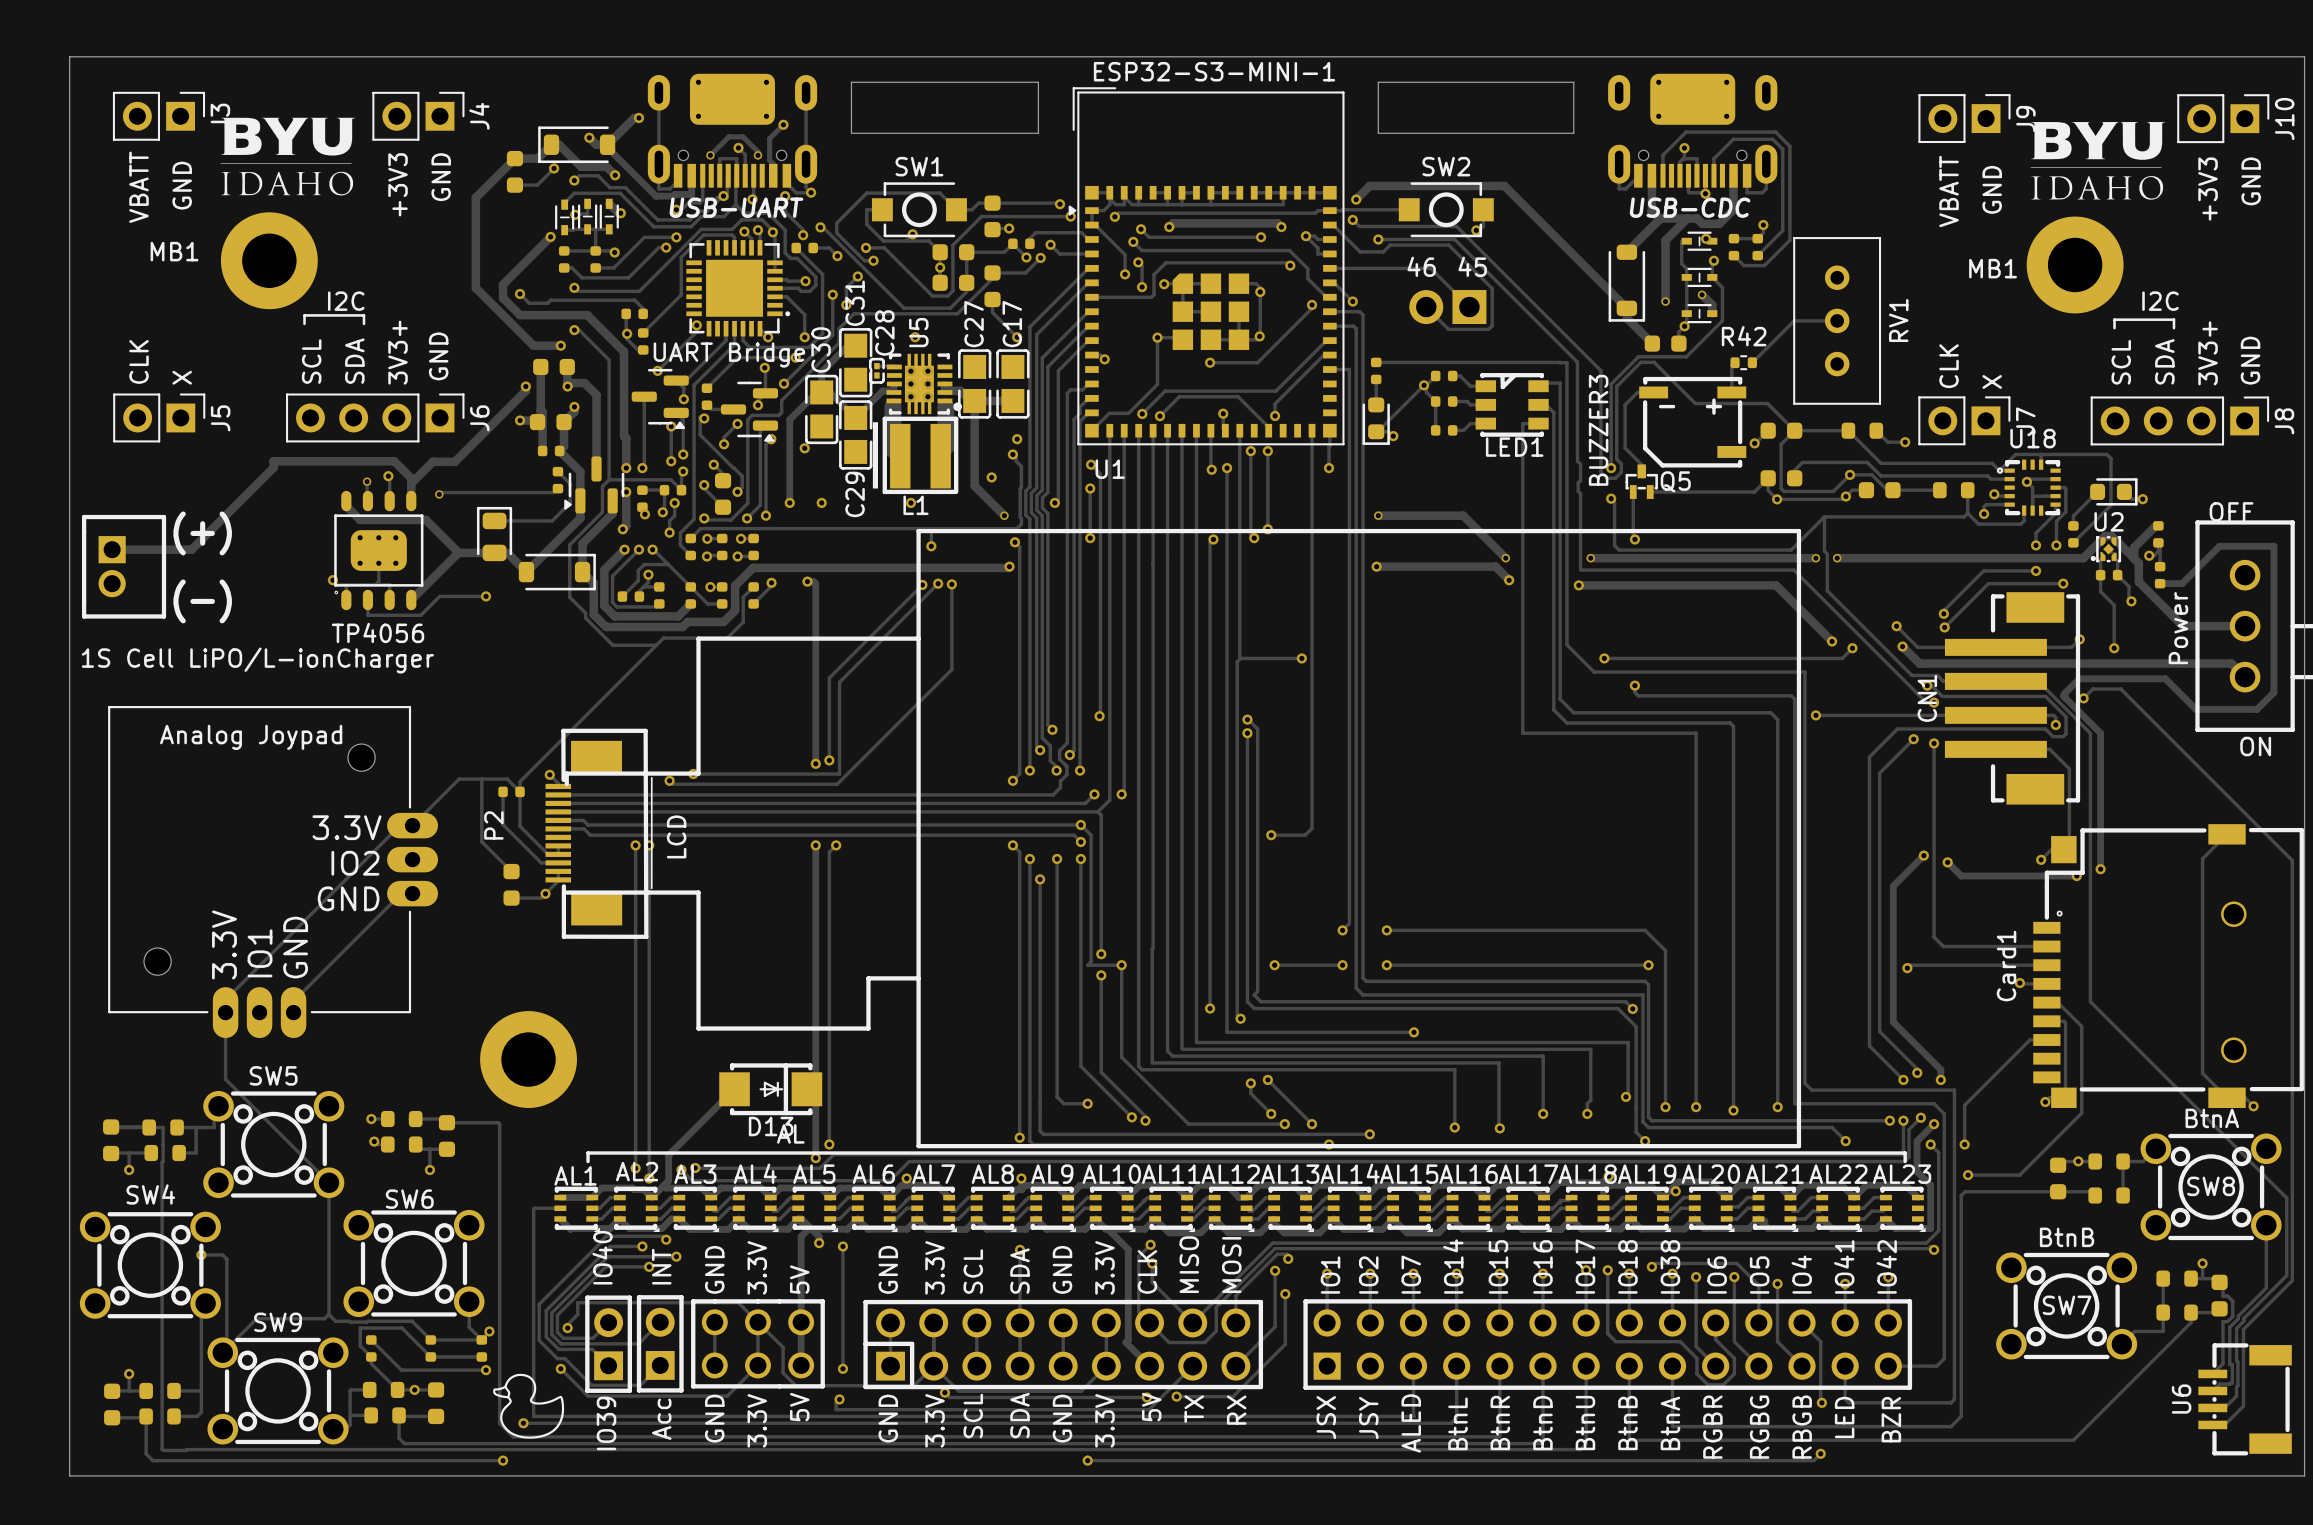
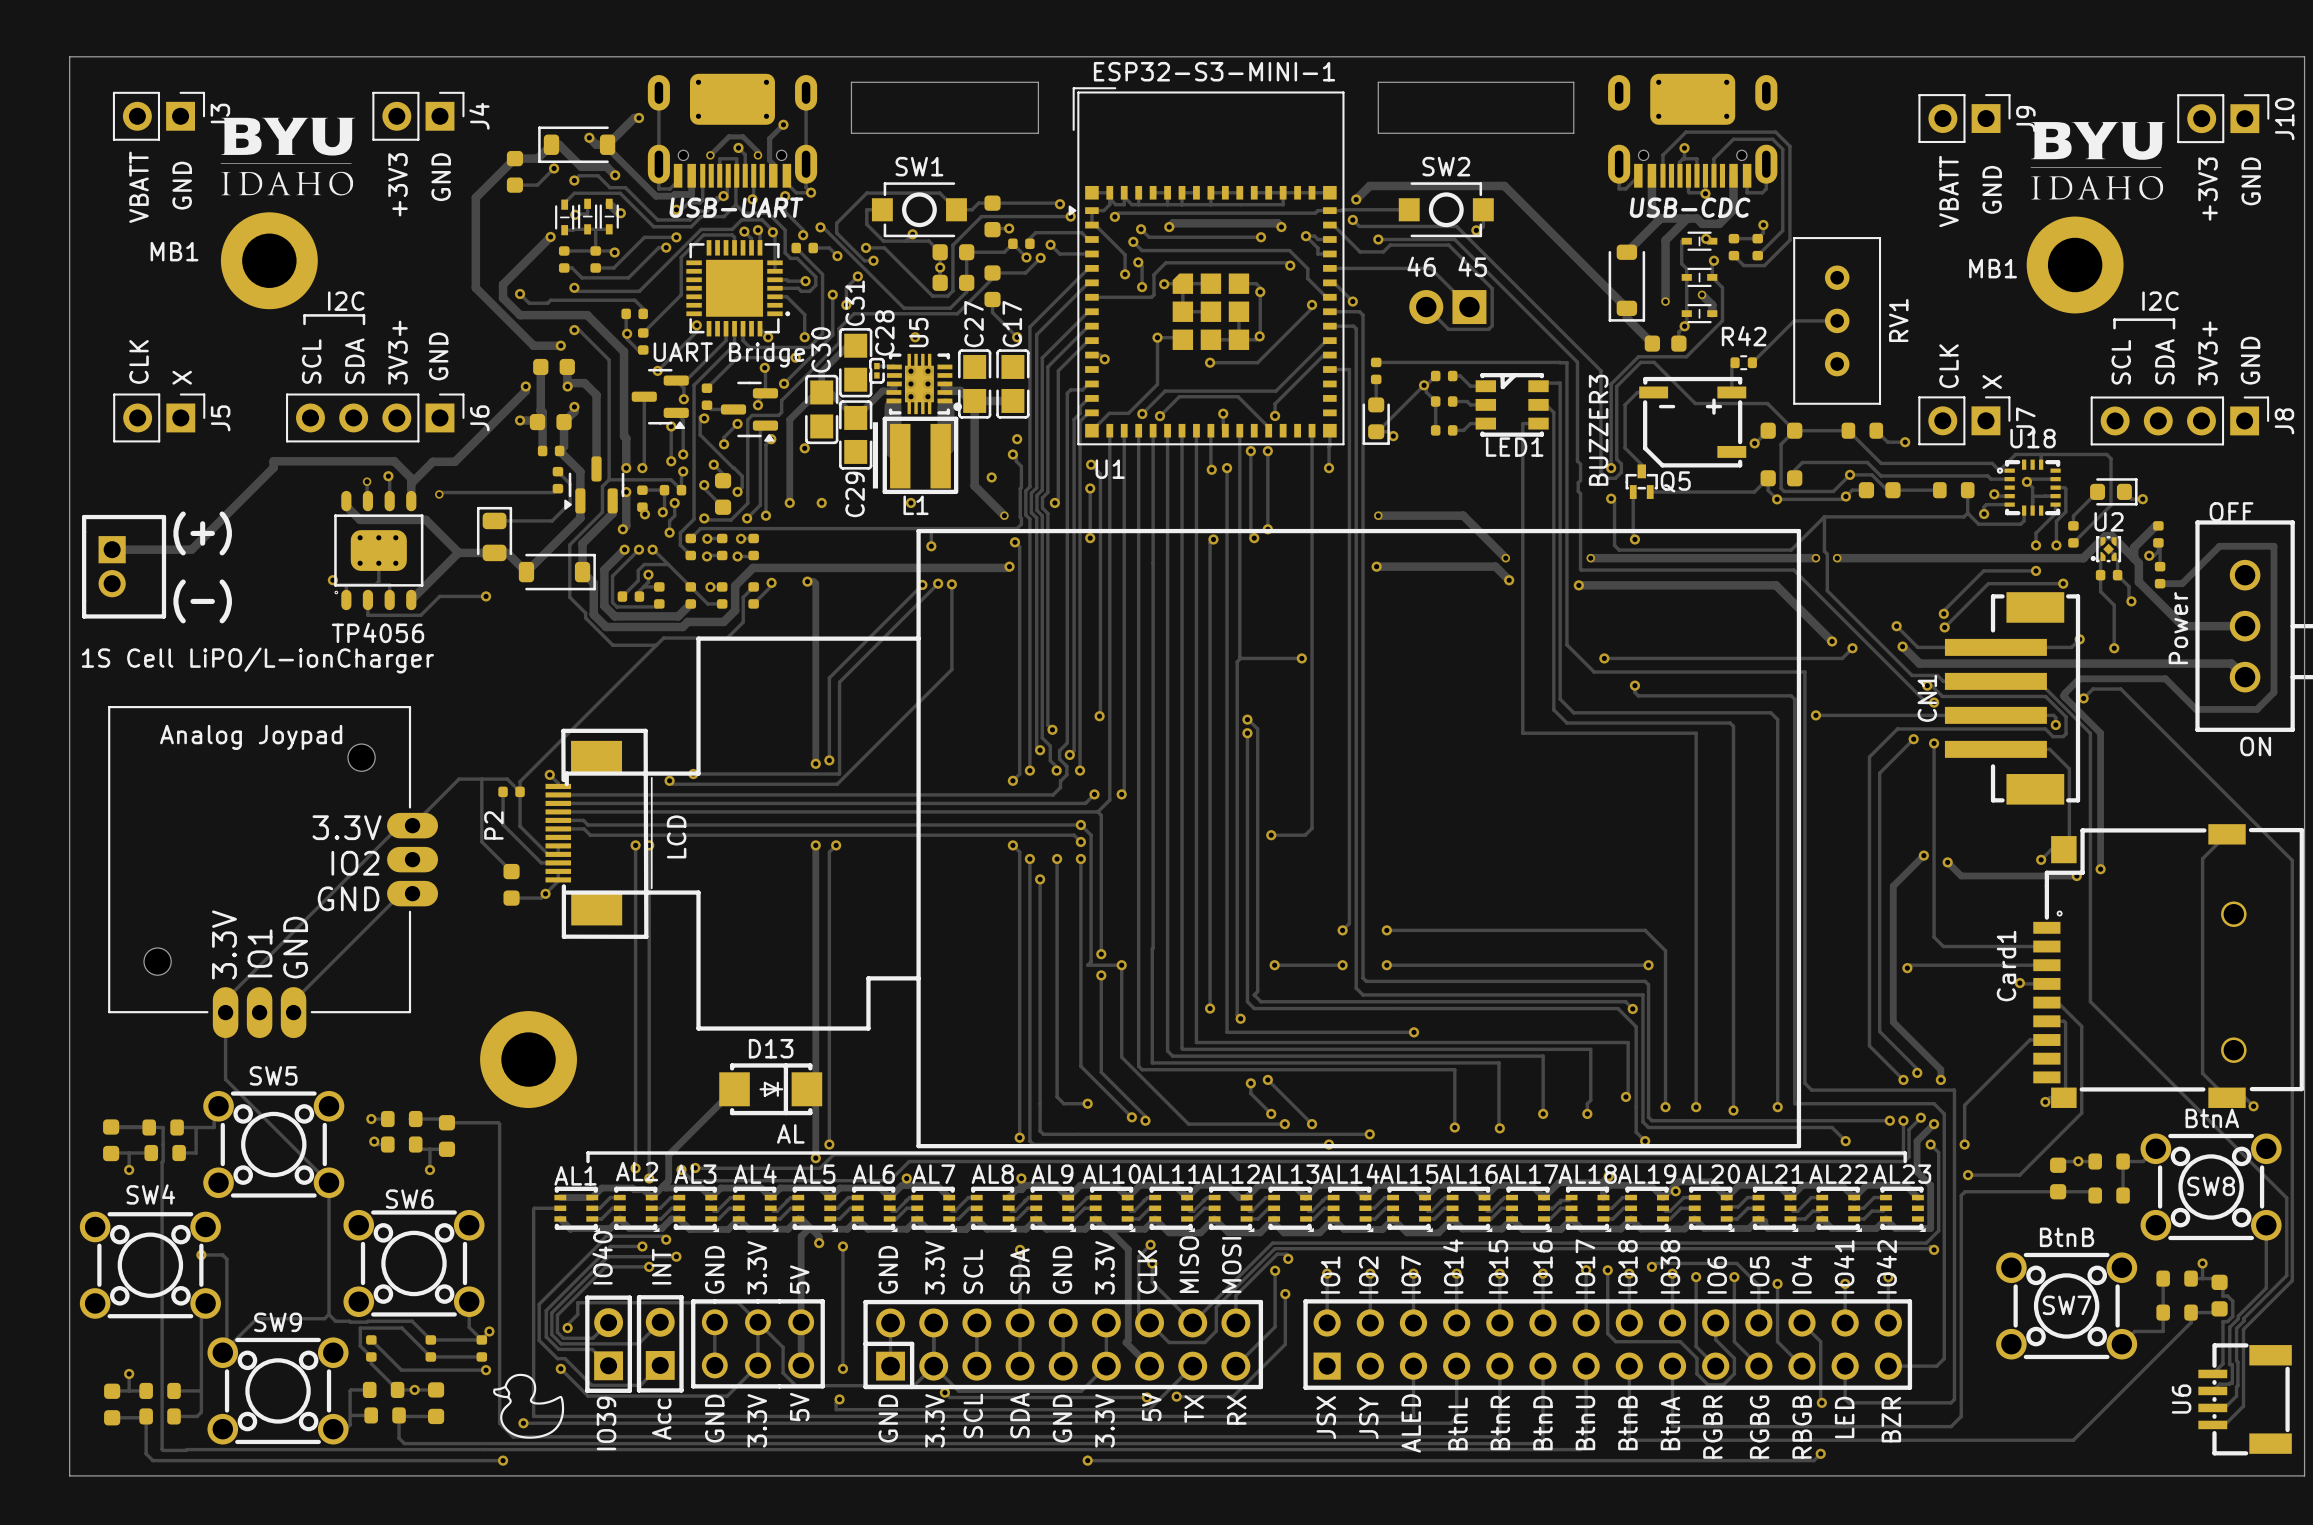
D13 name position: D13 (771, 1126) -> D13 (771, 1048)

